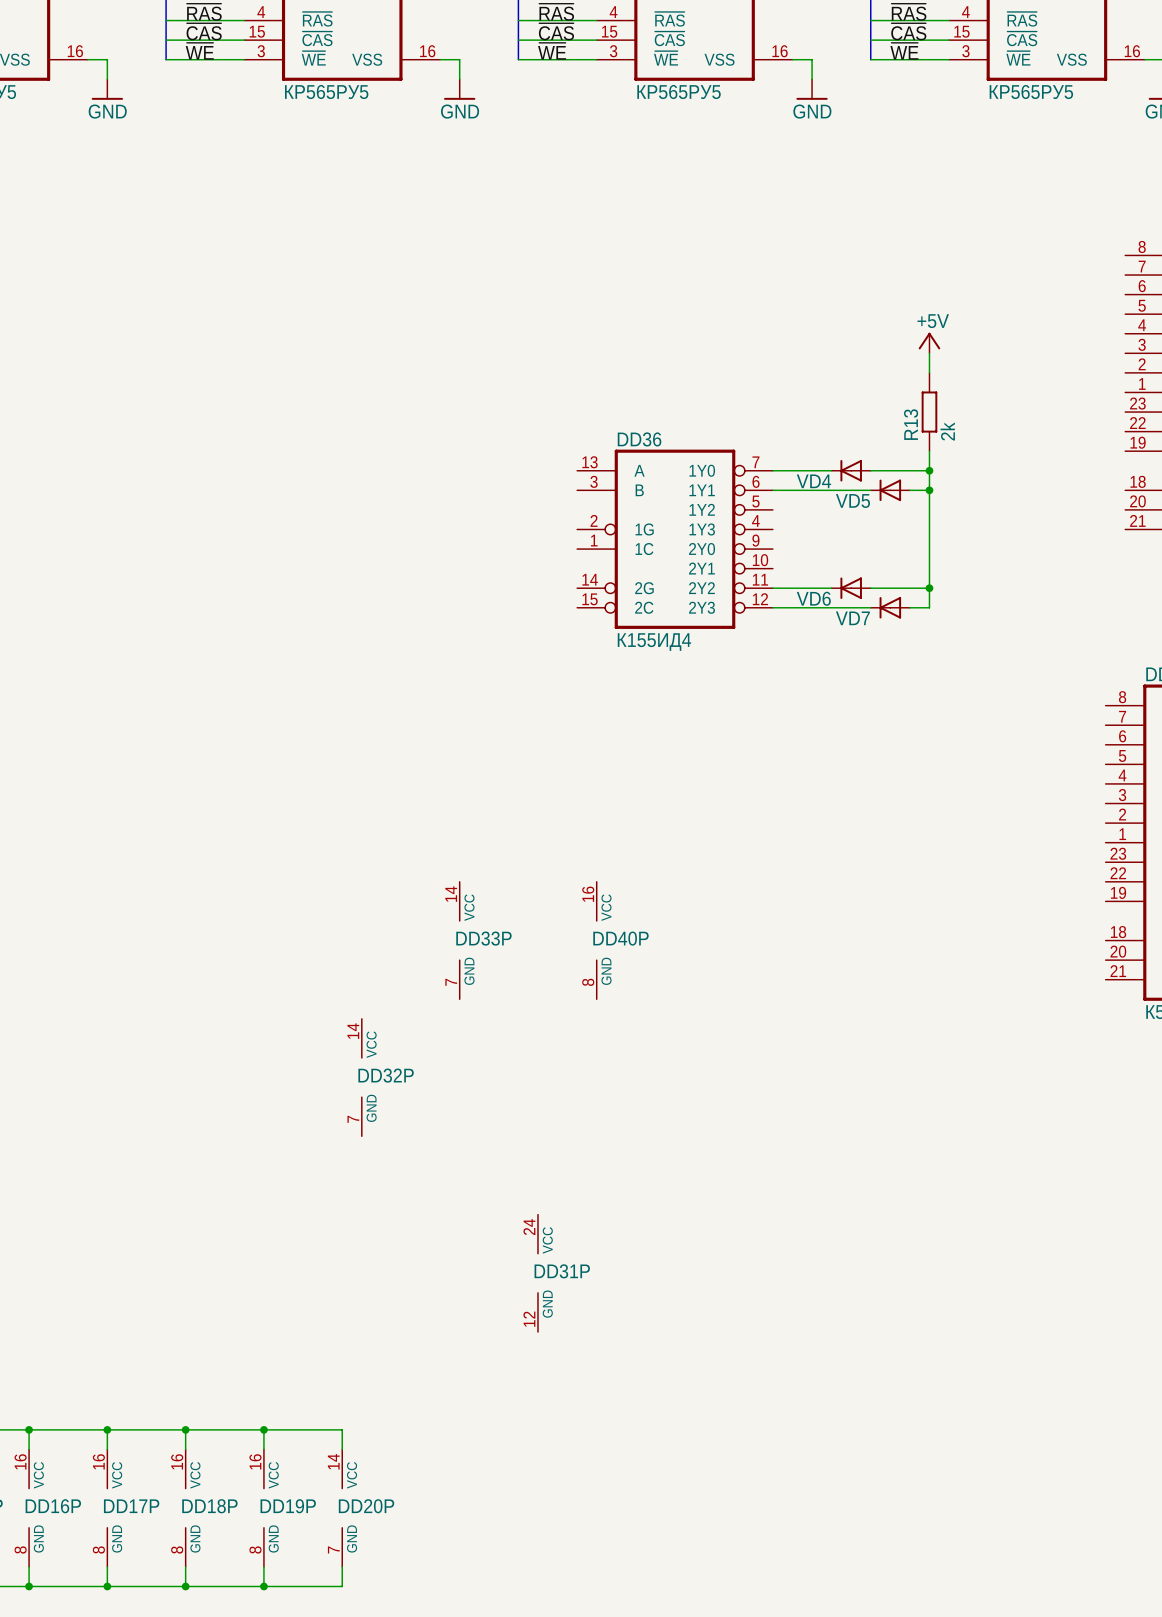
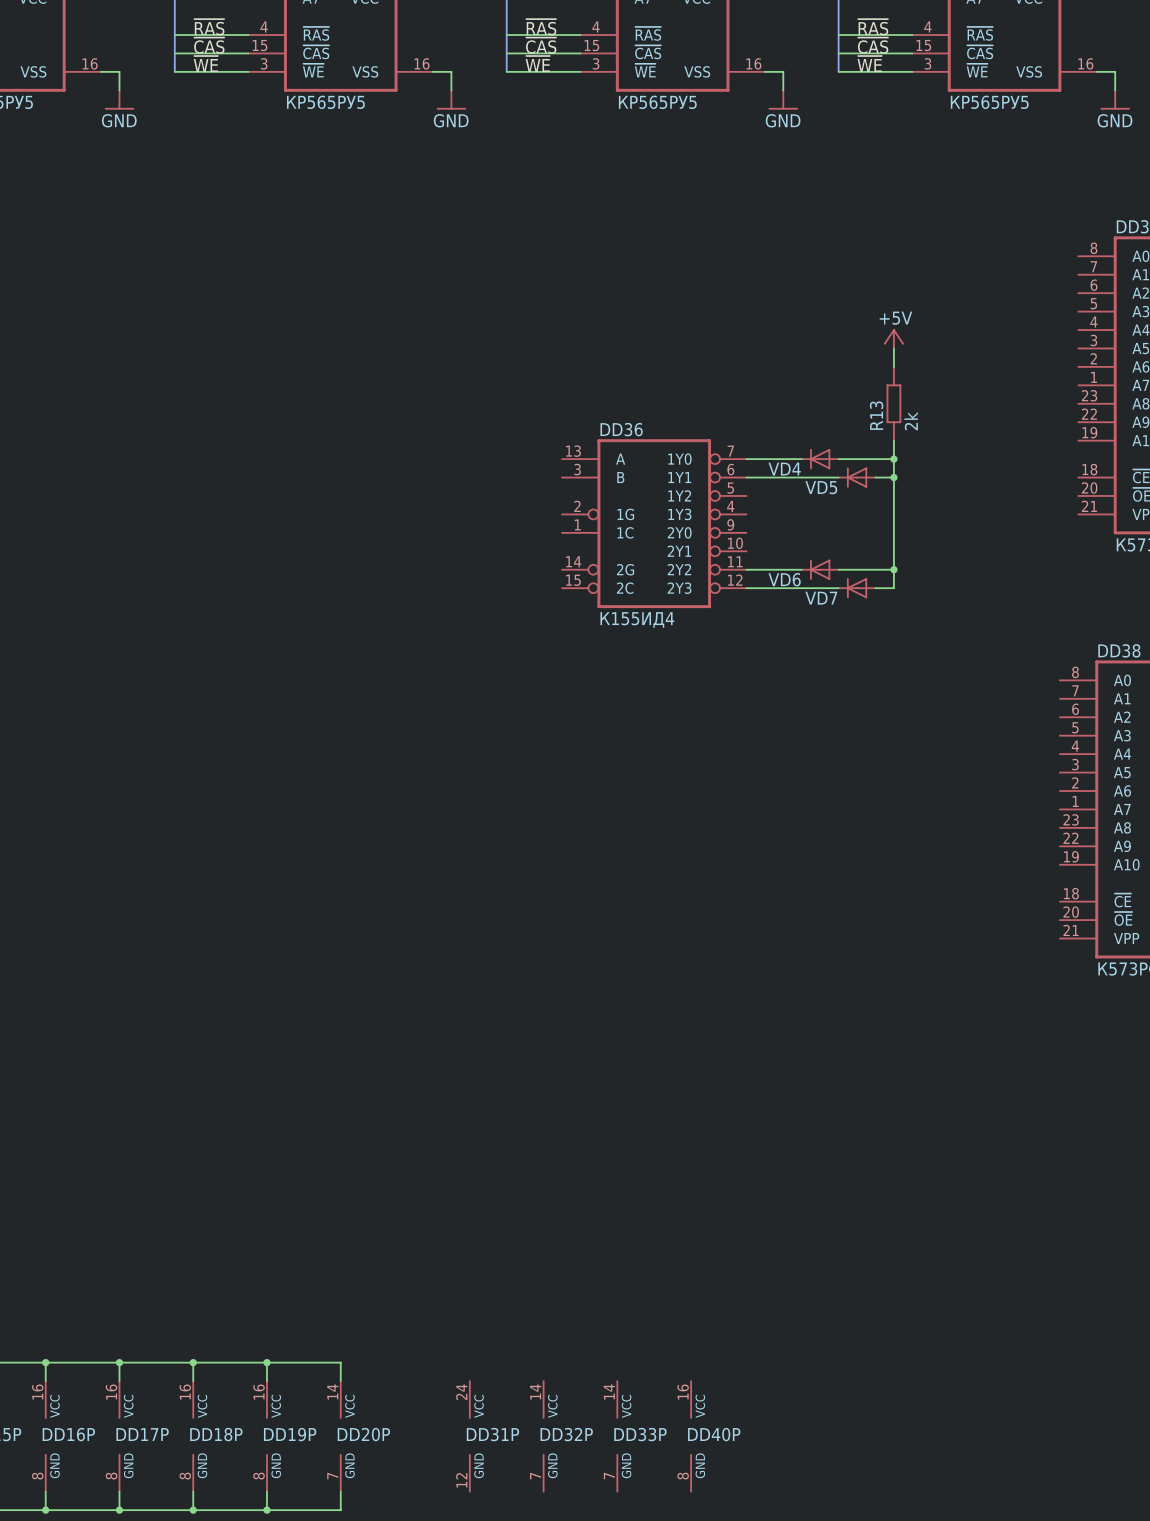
DD33P position: (459, 940) -> (617, 1436)
DD40P position: (596, 940) -> (691, 1436)
DD32P position: (361, 1077) -> (543, 1436)
DD31P position: (537, 1273) -> (469, 1436)

